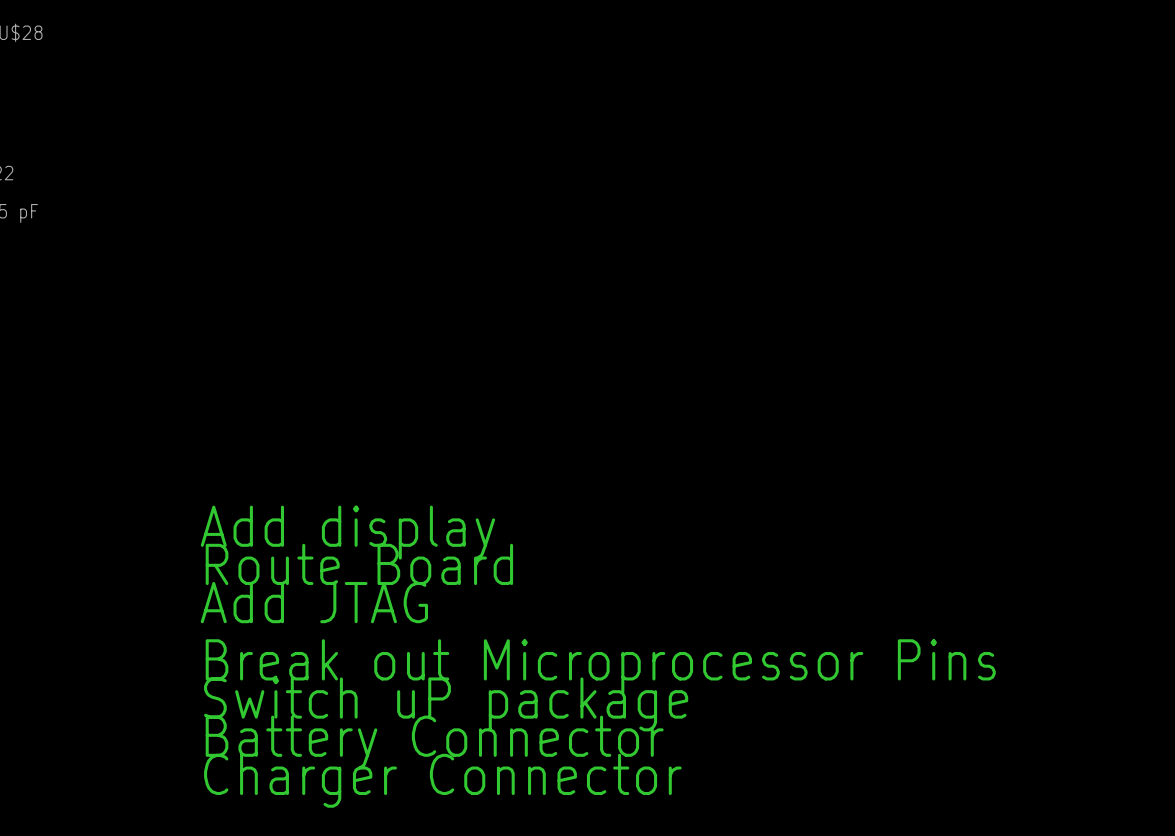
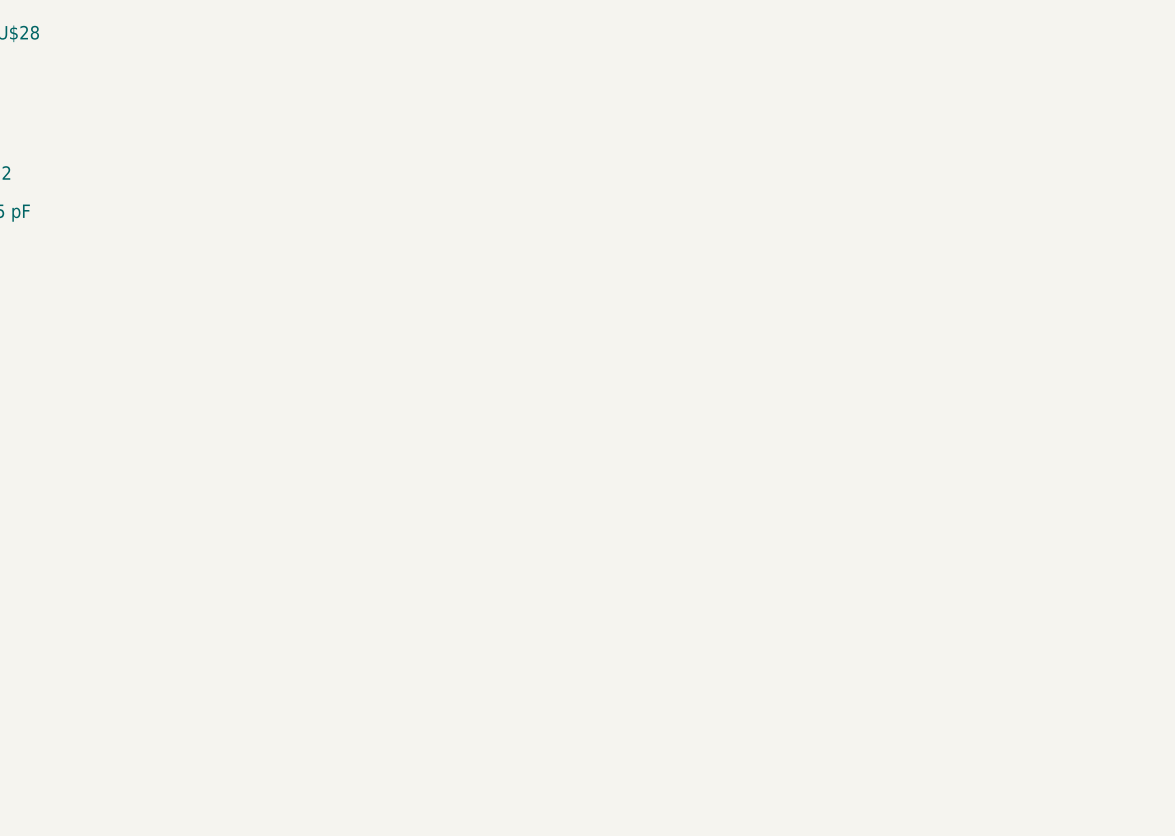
text: Add display (347, 532) -> none
text: Route Board (359, 564) -> none
text: Add JTAG (314, 602) -> none
text: Break out Microprocessor Pins (600, 666) -> none
text: Switch uP package (446, 704) -> none
text: Battery Connector (434, 742) -> none
text: Charger Connector (442, 780) -> none

